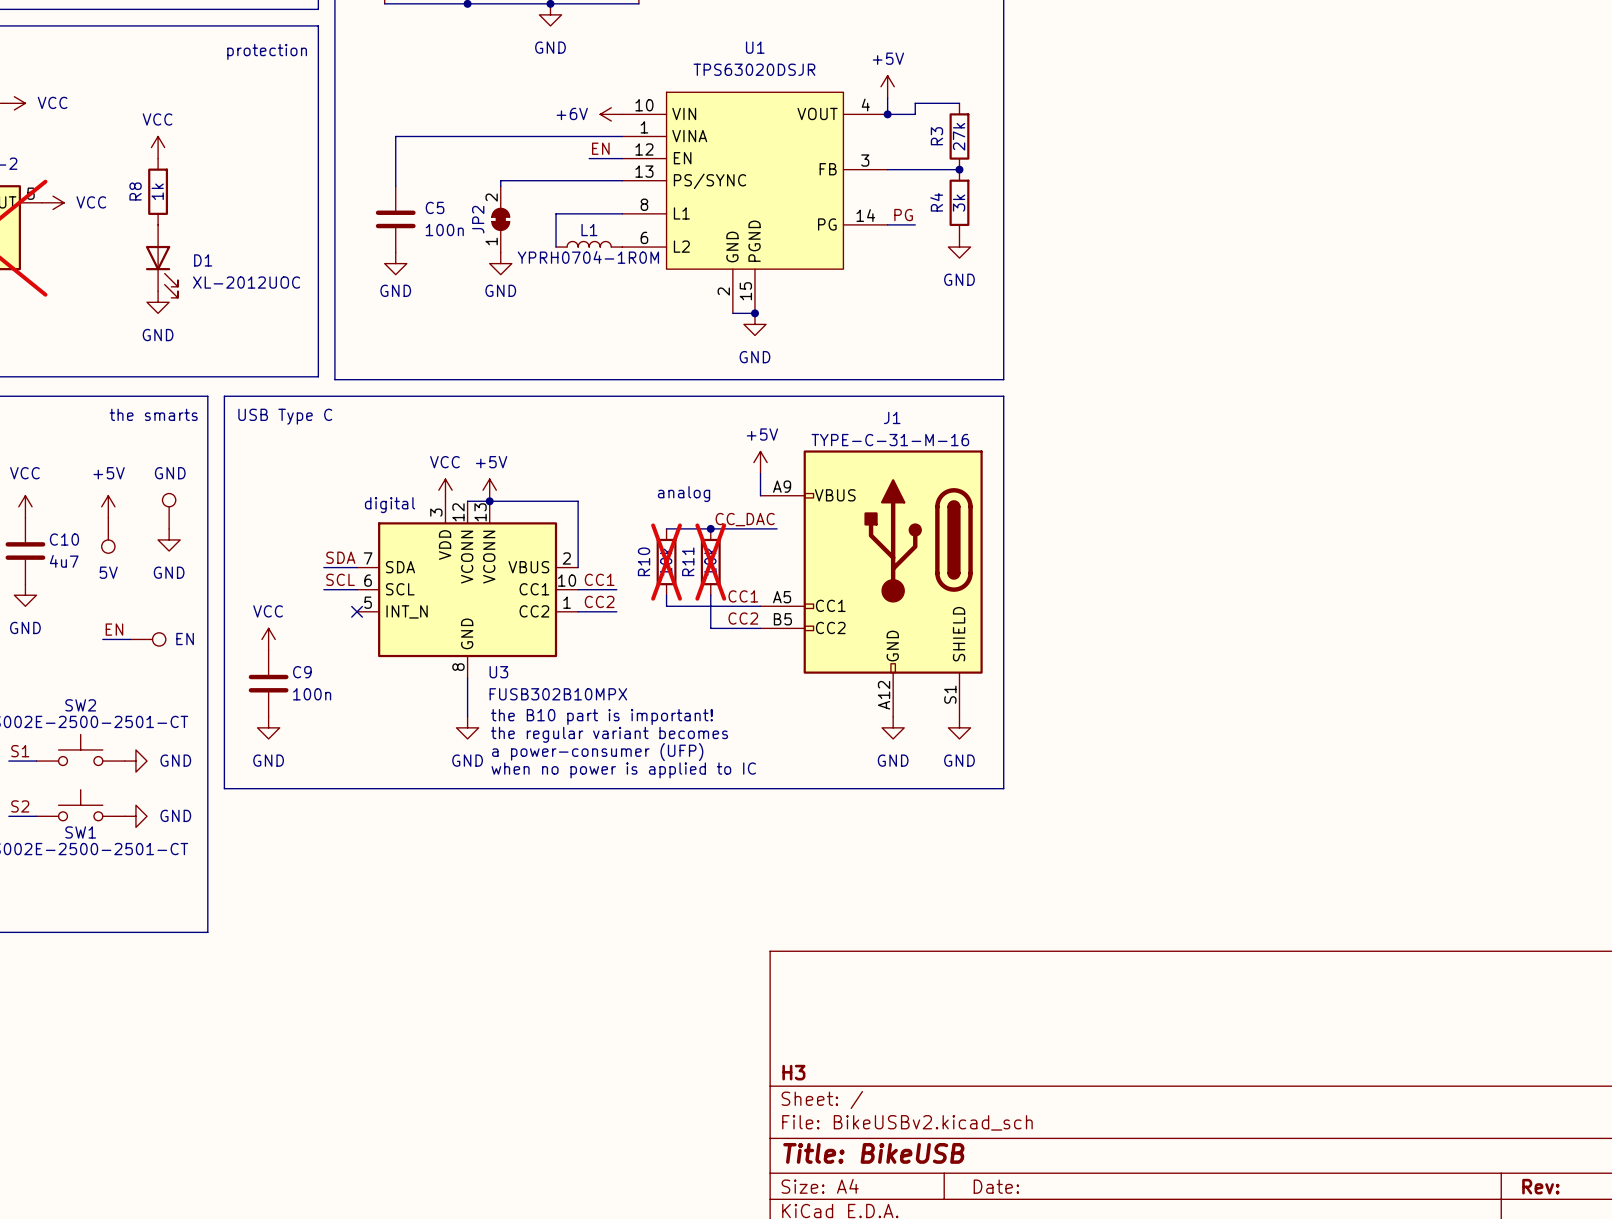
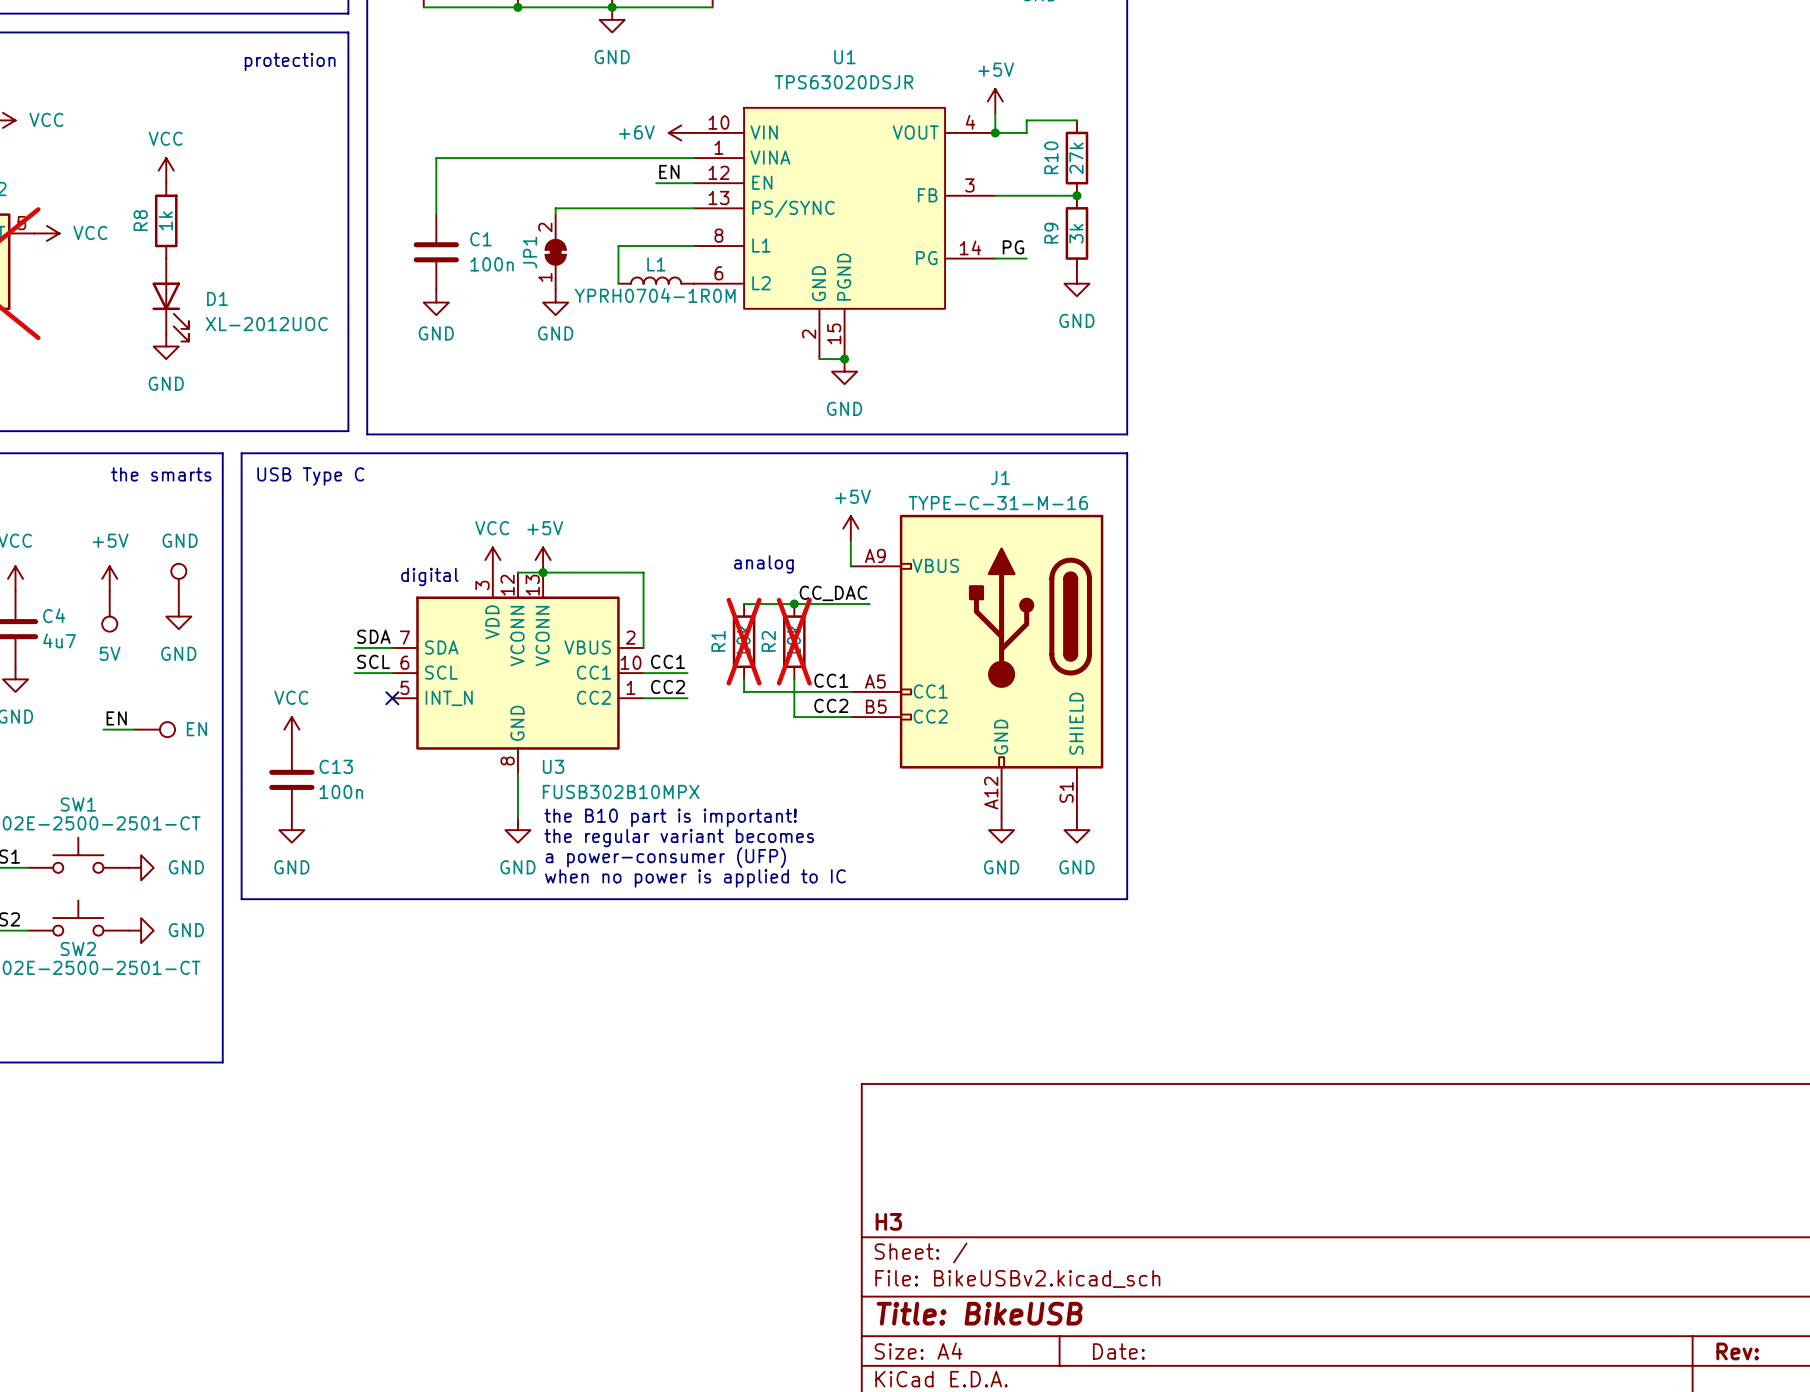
R3 name: R3 (936, 136) -> R10 (1051, 157)
R4 name: R4 (936, 202) -> R9 (1051, 233)
C5 name: C5 (435, 207) -> C1 (480, 239)
JP2 name: JP2 (478, 219) -> JP1 (530, 252)
C10 name: C10 (64, 539) -> C4 (54, 615)
R10 name: R10 (644, 561) -> R1 (718, 641)
R11 name: R11 (688, 561) -> R2 (768, 641)
C9 name: C9 (302, 672) -> C13 (336, 766)
SW2 name: SW2 (80, 705) -> SW1 (78, 804)
SW1 name: SW1 (80, 832) -> SW2 (78, 948)

